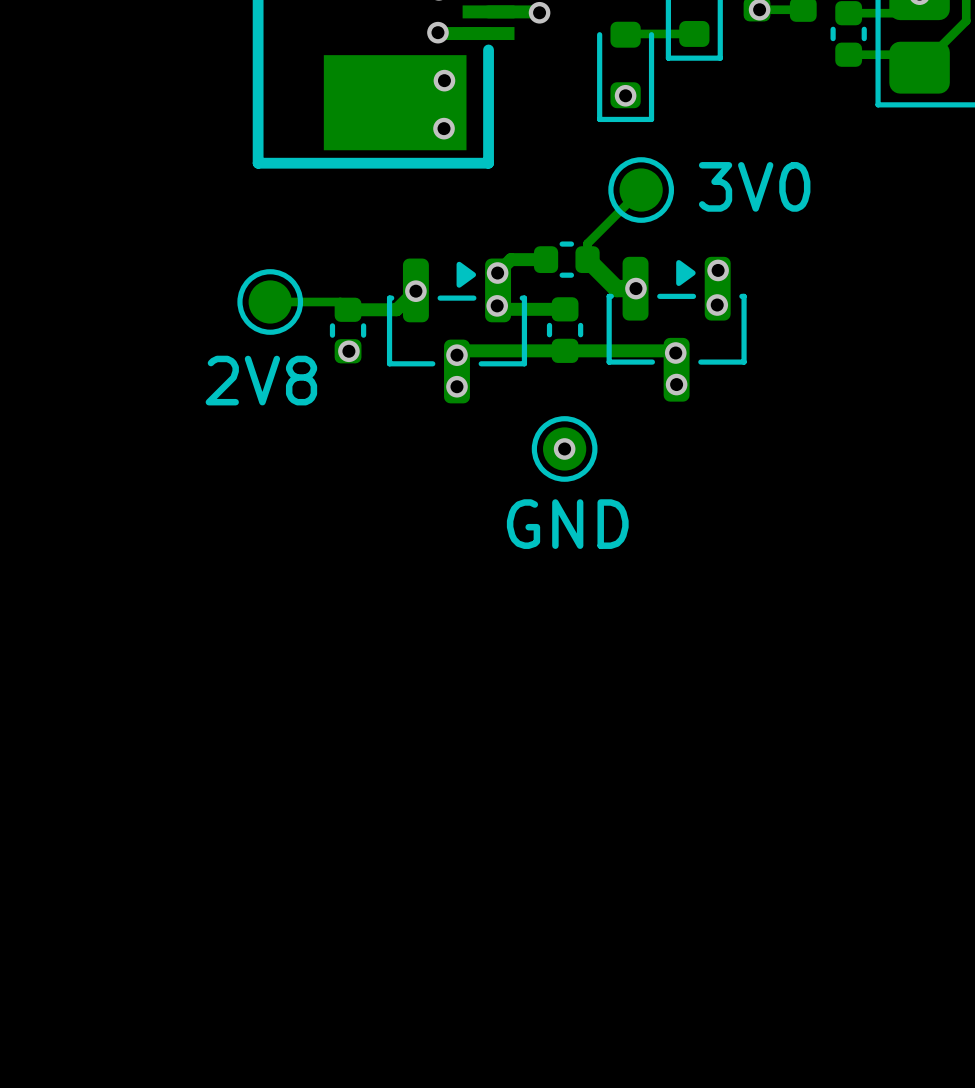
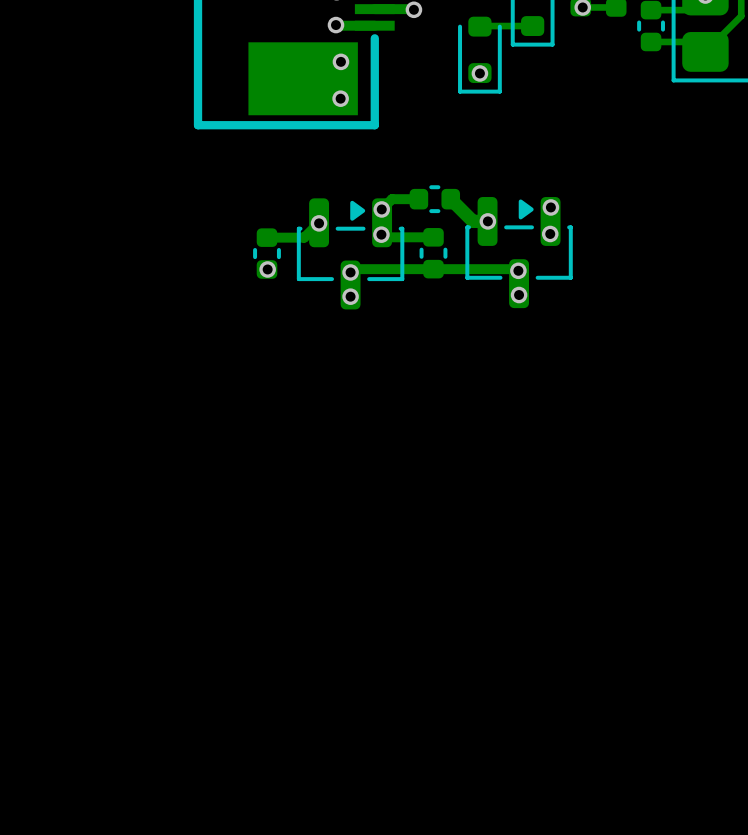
track: (641, 190) (587, 243) (587, 259) -> none
part: 3V0 (641, 190) -> none
track: (270, 301) (340, 301) (348, 309) -> none
part: 2V8 (270, 301) -> none
part: GND (564, 448) -> none
via: (564, 448) -> none

